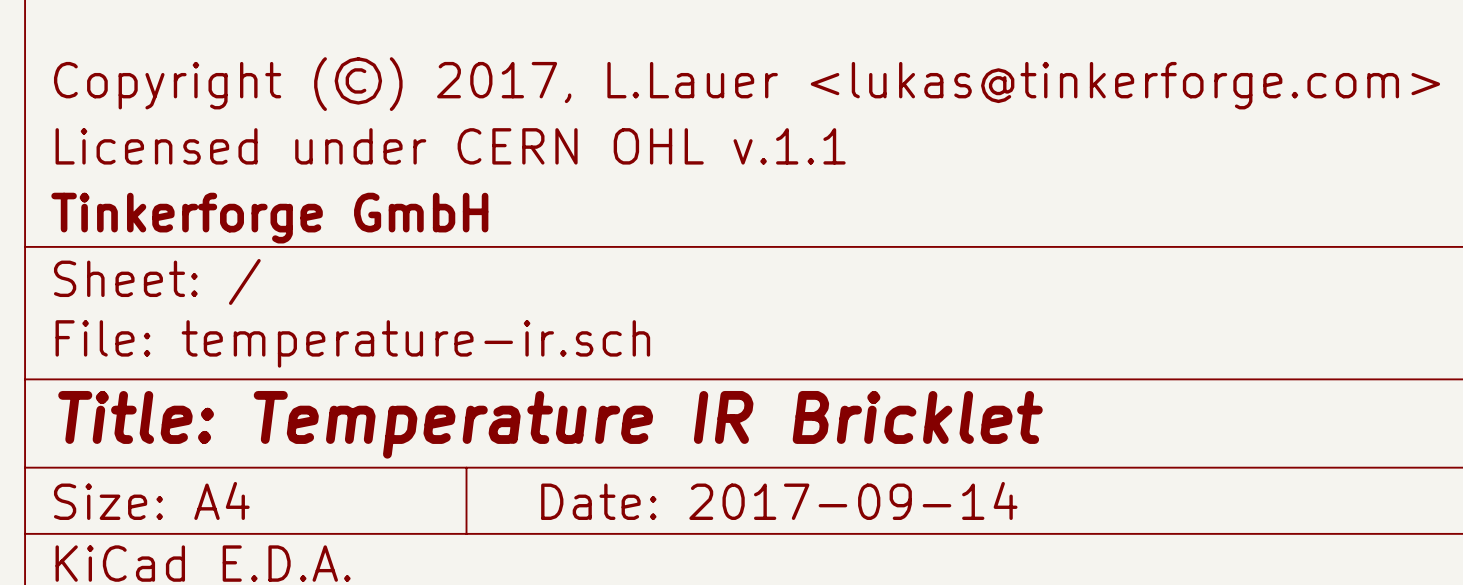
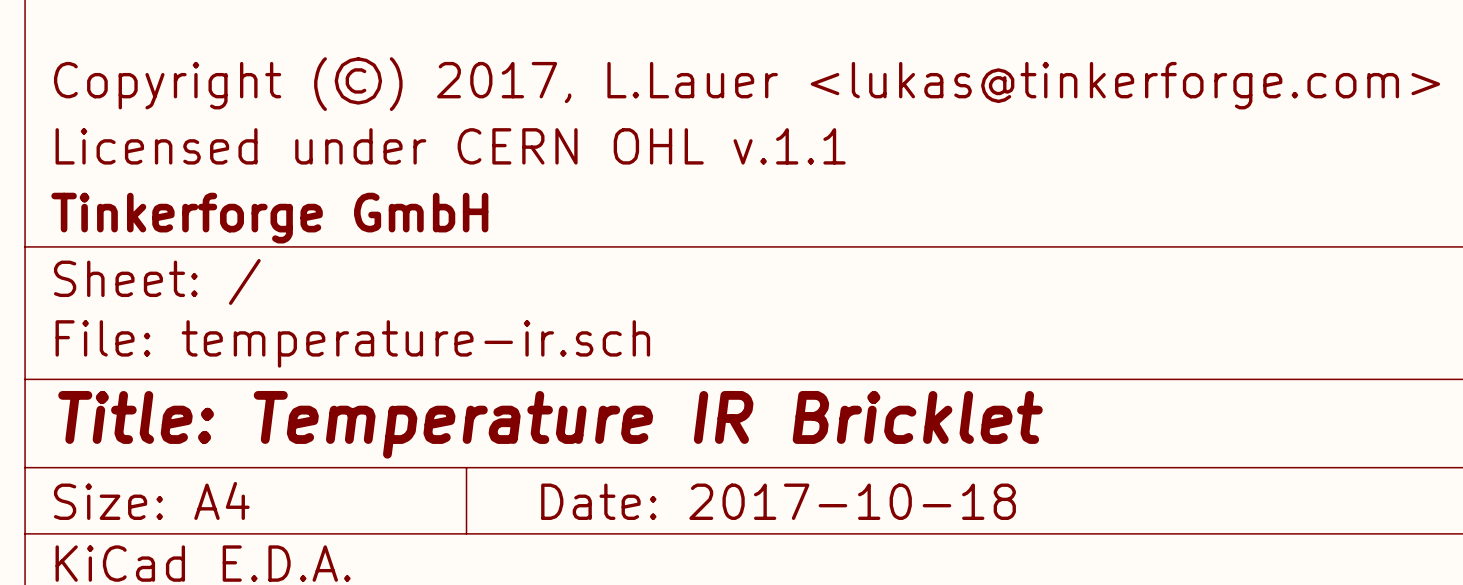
title block: Date: 2017-09-14 (779, 500) -> Date: 2017-10-18 (778, 501)

